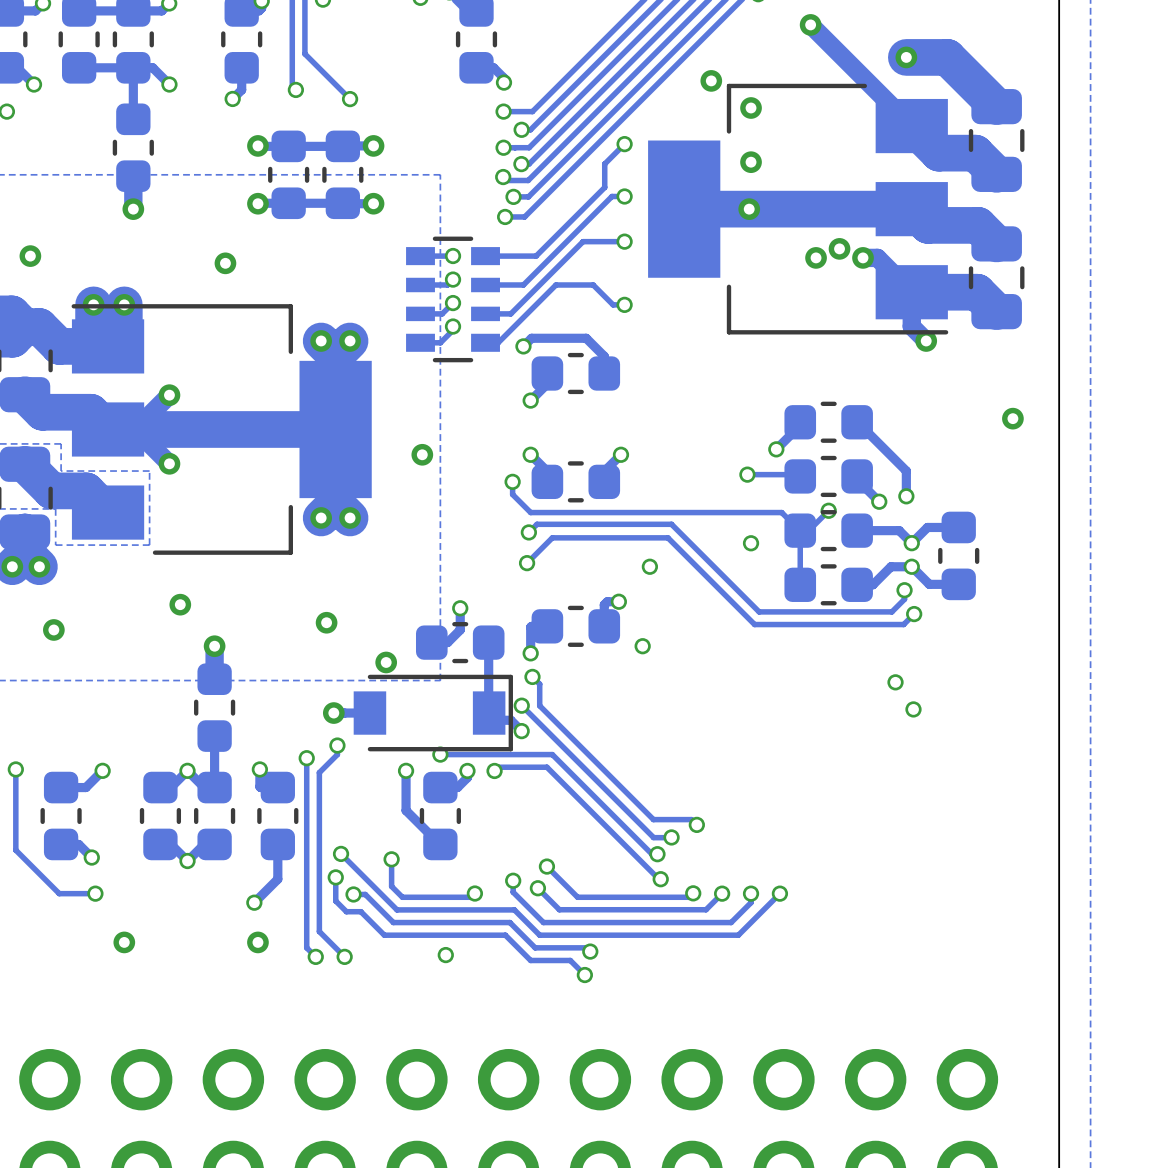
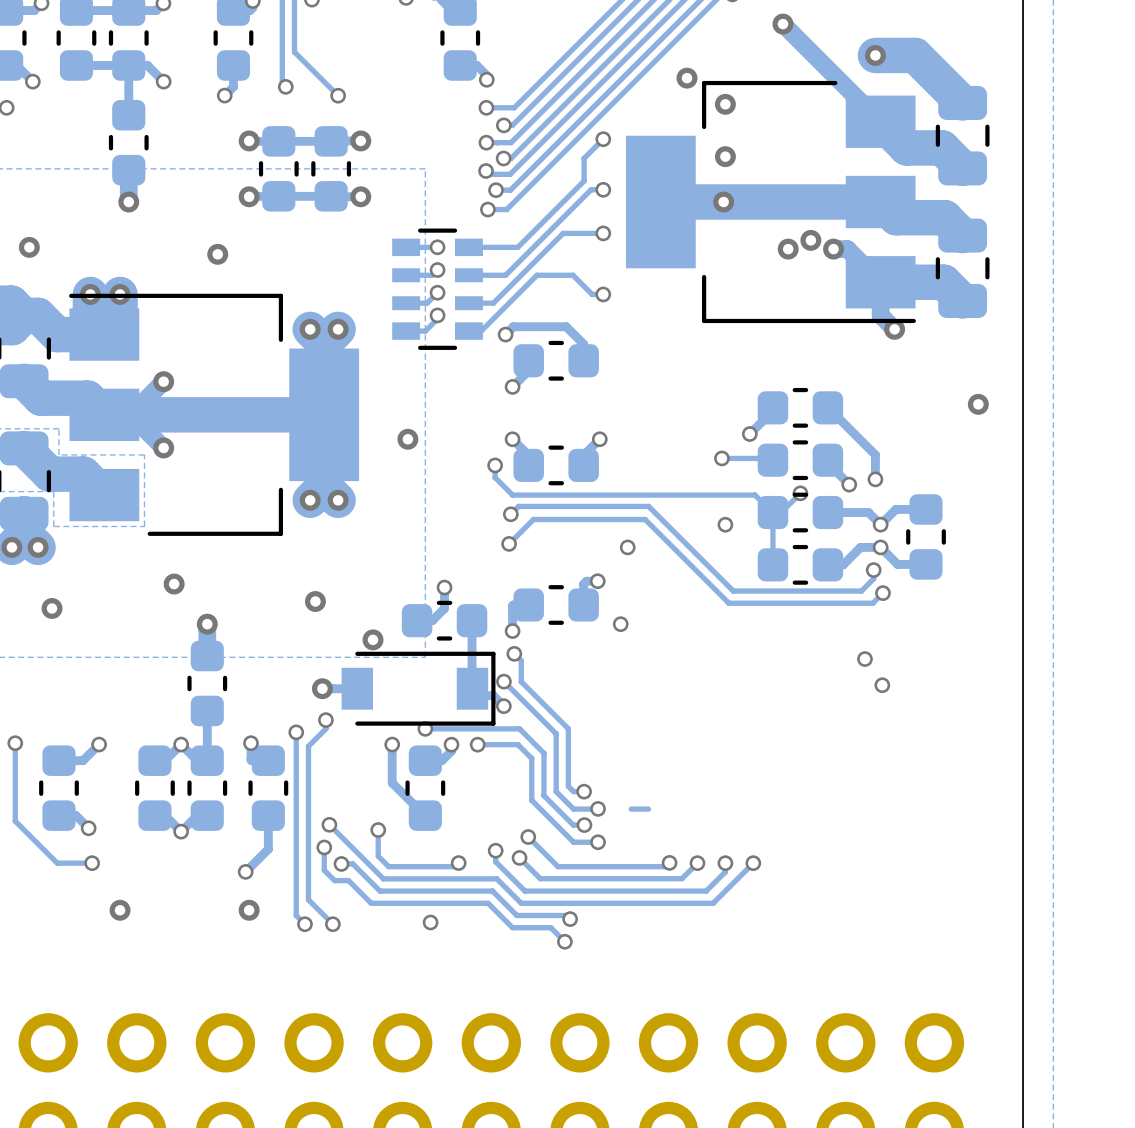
track: (537, 754) (552, 754) (651, 854) (657, 854) -> (519, 728) (543, 753) (543, 795) (573, 825) (584, 825)
track: (588, 754) (653, 819) (691, 819) (696, 824) -> (568, 728) (568, 786) (573, 791) (584, 791)
track: (575, 759) (653, 837) -> (556, 733) (556, 791) (573, 809) (597, 809)
track: (494, 770) (498, 767) (546, 767) (660, 879) -> (477, 744) (517, 744) (531, 758) (531, 800) (573, 842) (598, 842)
via: none -> (584, 791)
via: (696, 824) -> none
via: none -> (598, 808)
via: (671, 837) -> none
via: none -> (584, 825)
via: (657, 854) -> none
via: none -> (598, 842)
via: (660, 879) -> none

